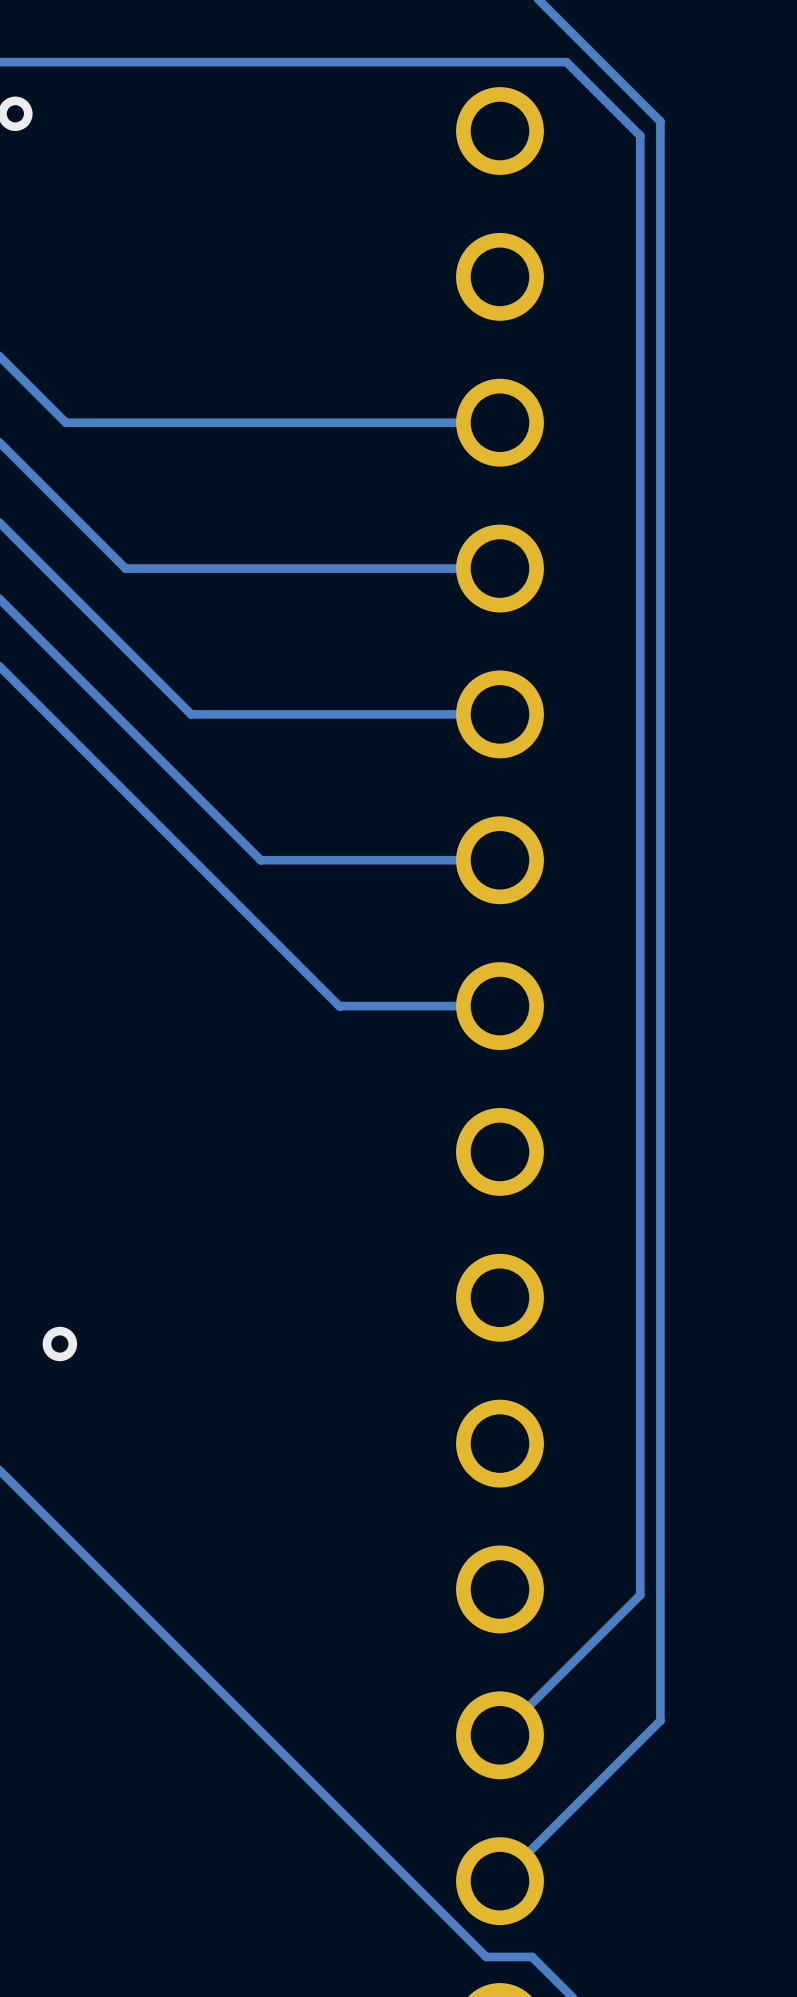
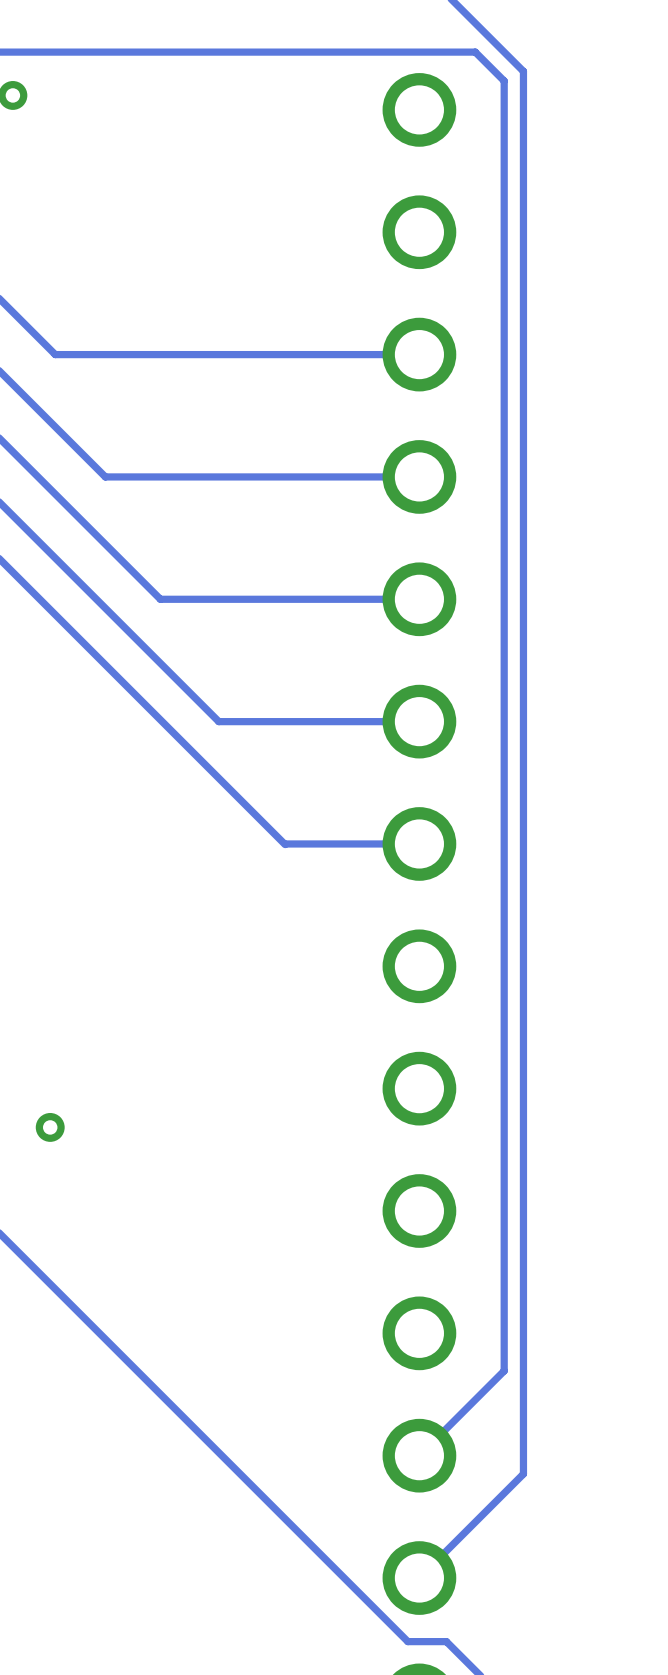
track: (624, 85) (660, 121) (660, 1720) (624, 1757) -> (523, 71) (523, 1473)
track: (601, 96) (640, 135) (640, 1595) (601, 1634) -> (504, 81) (504, 1370)

